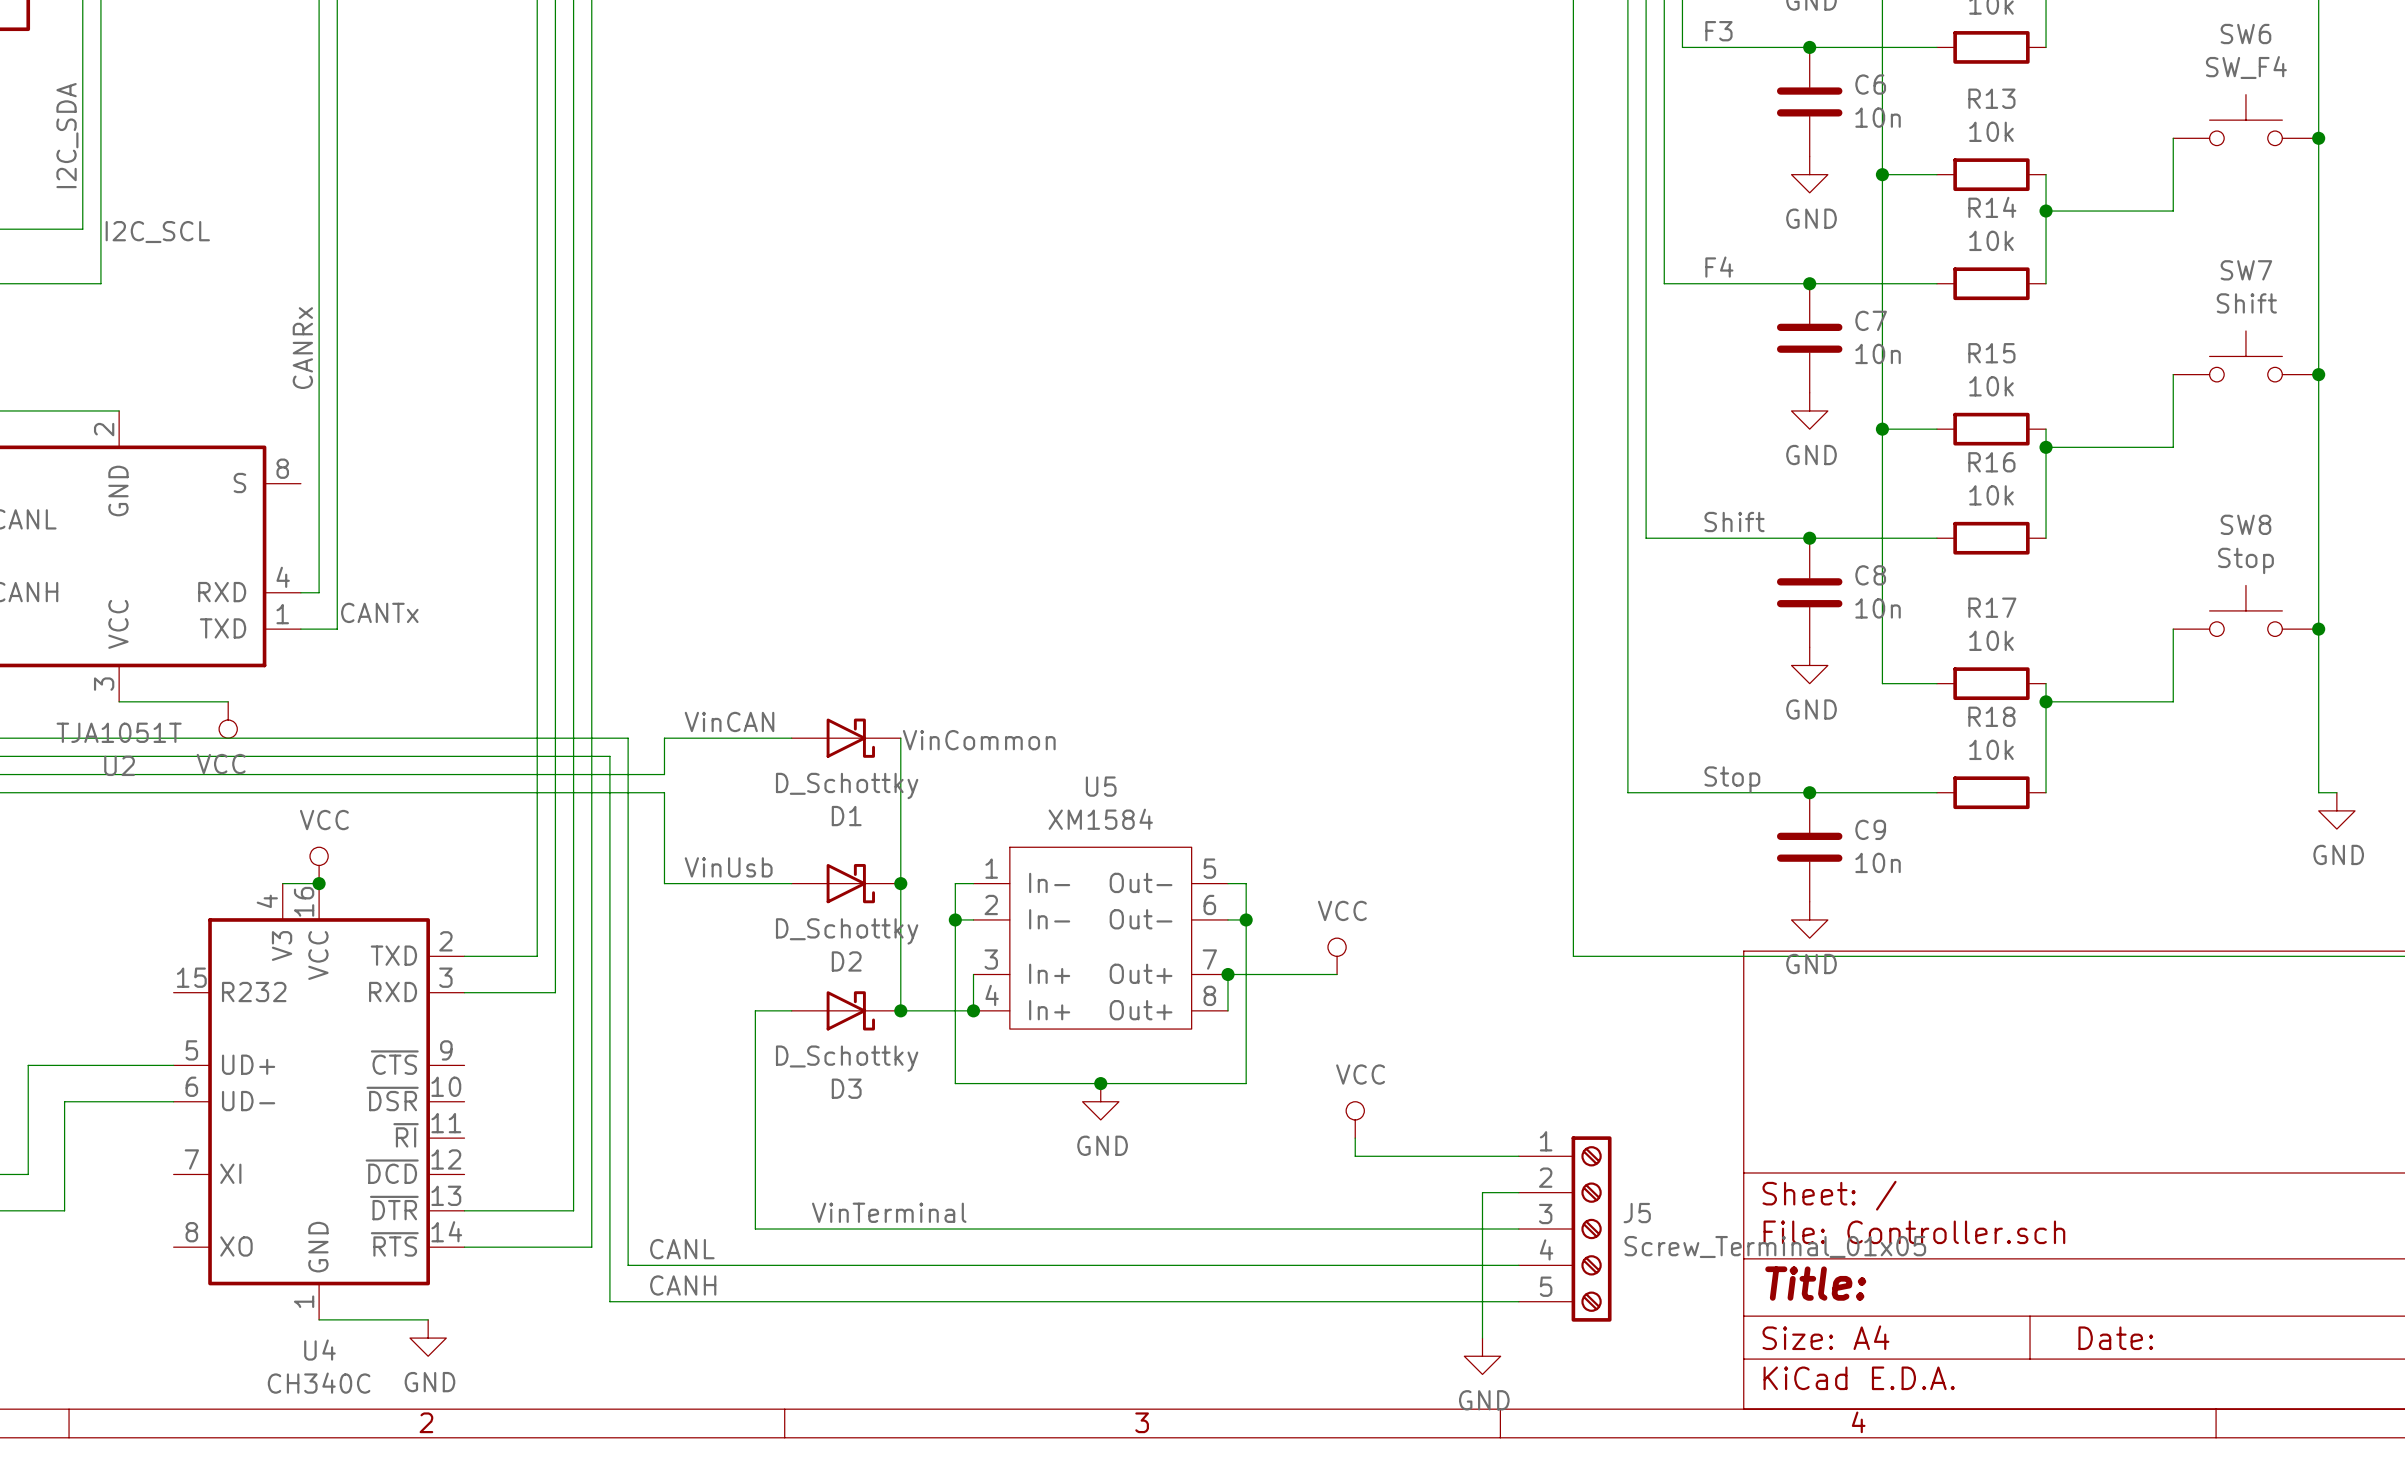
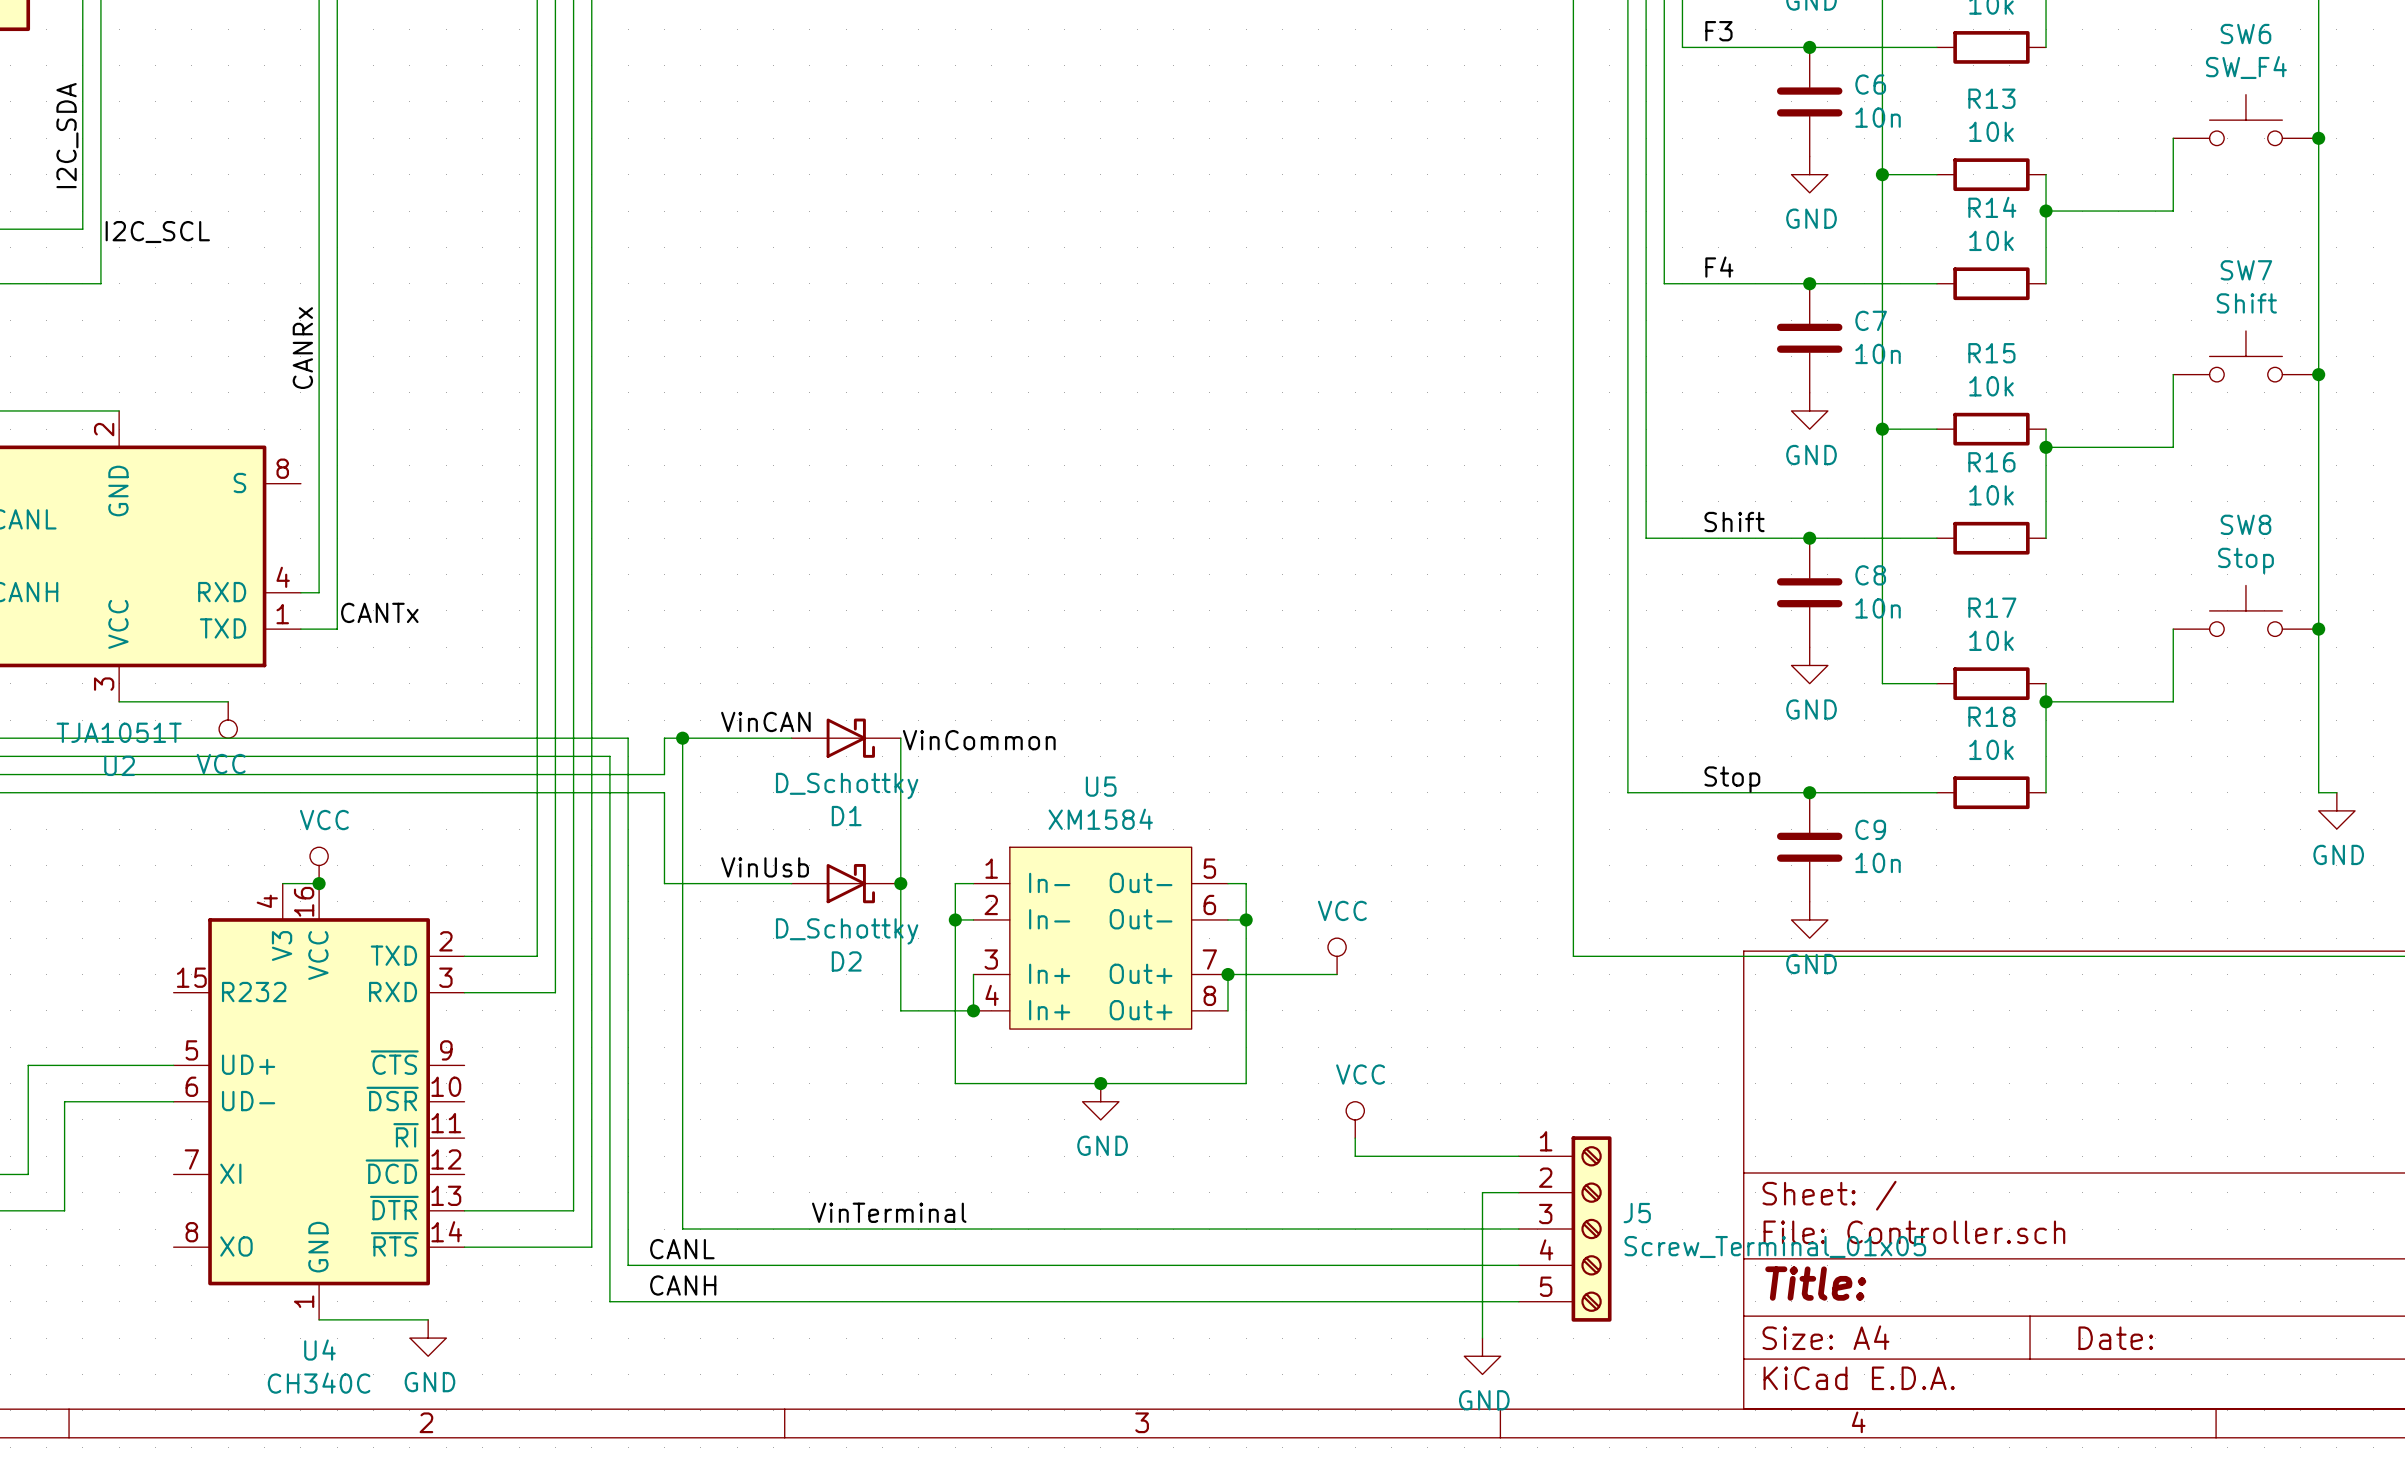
label position: VinCAN (729, 721) -> VinCAN (765, 721)
junction: none -> (682, 738)
label position: VinUsb (728, 867) -> VinUsb (765, 867)
wire: (791, 1010) (755, 1010) (755, 1229) -> (682, 738) (682, 1229) (755, 1229)
D3: D_Schottky (846, 1010) -> none
junction: (900, 1010) -> none

